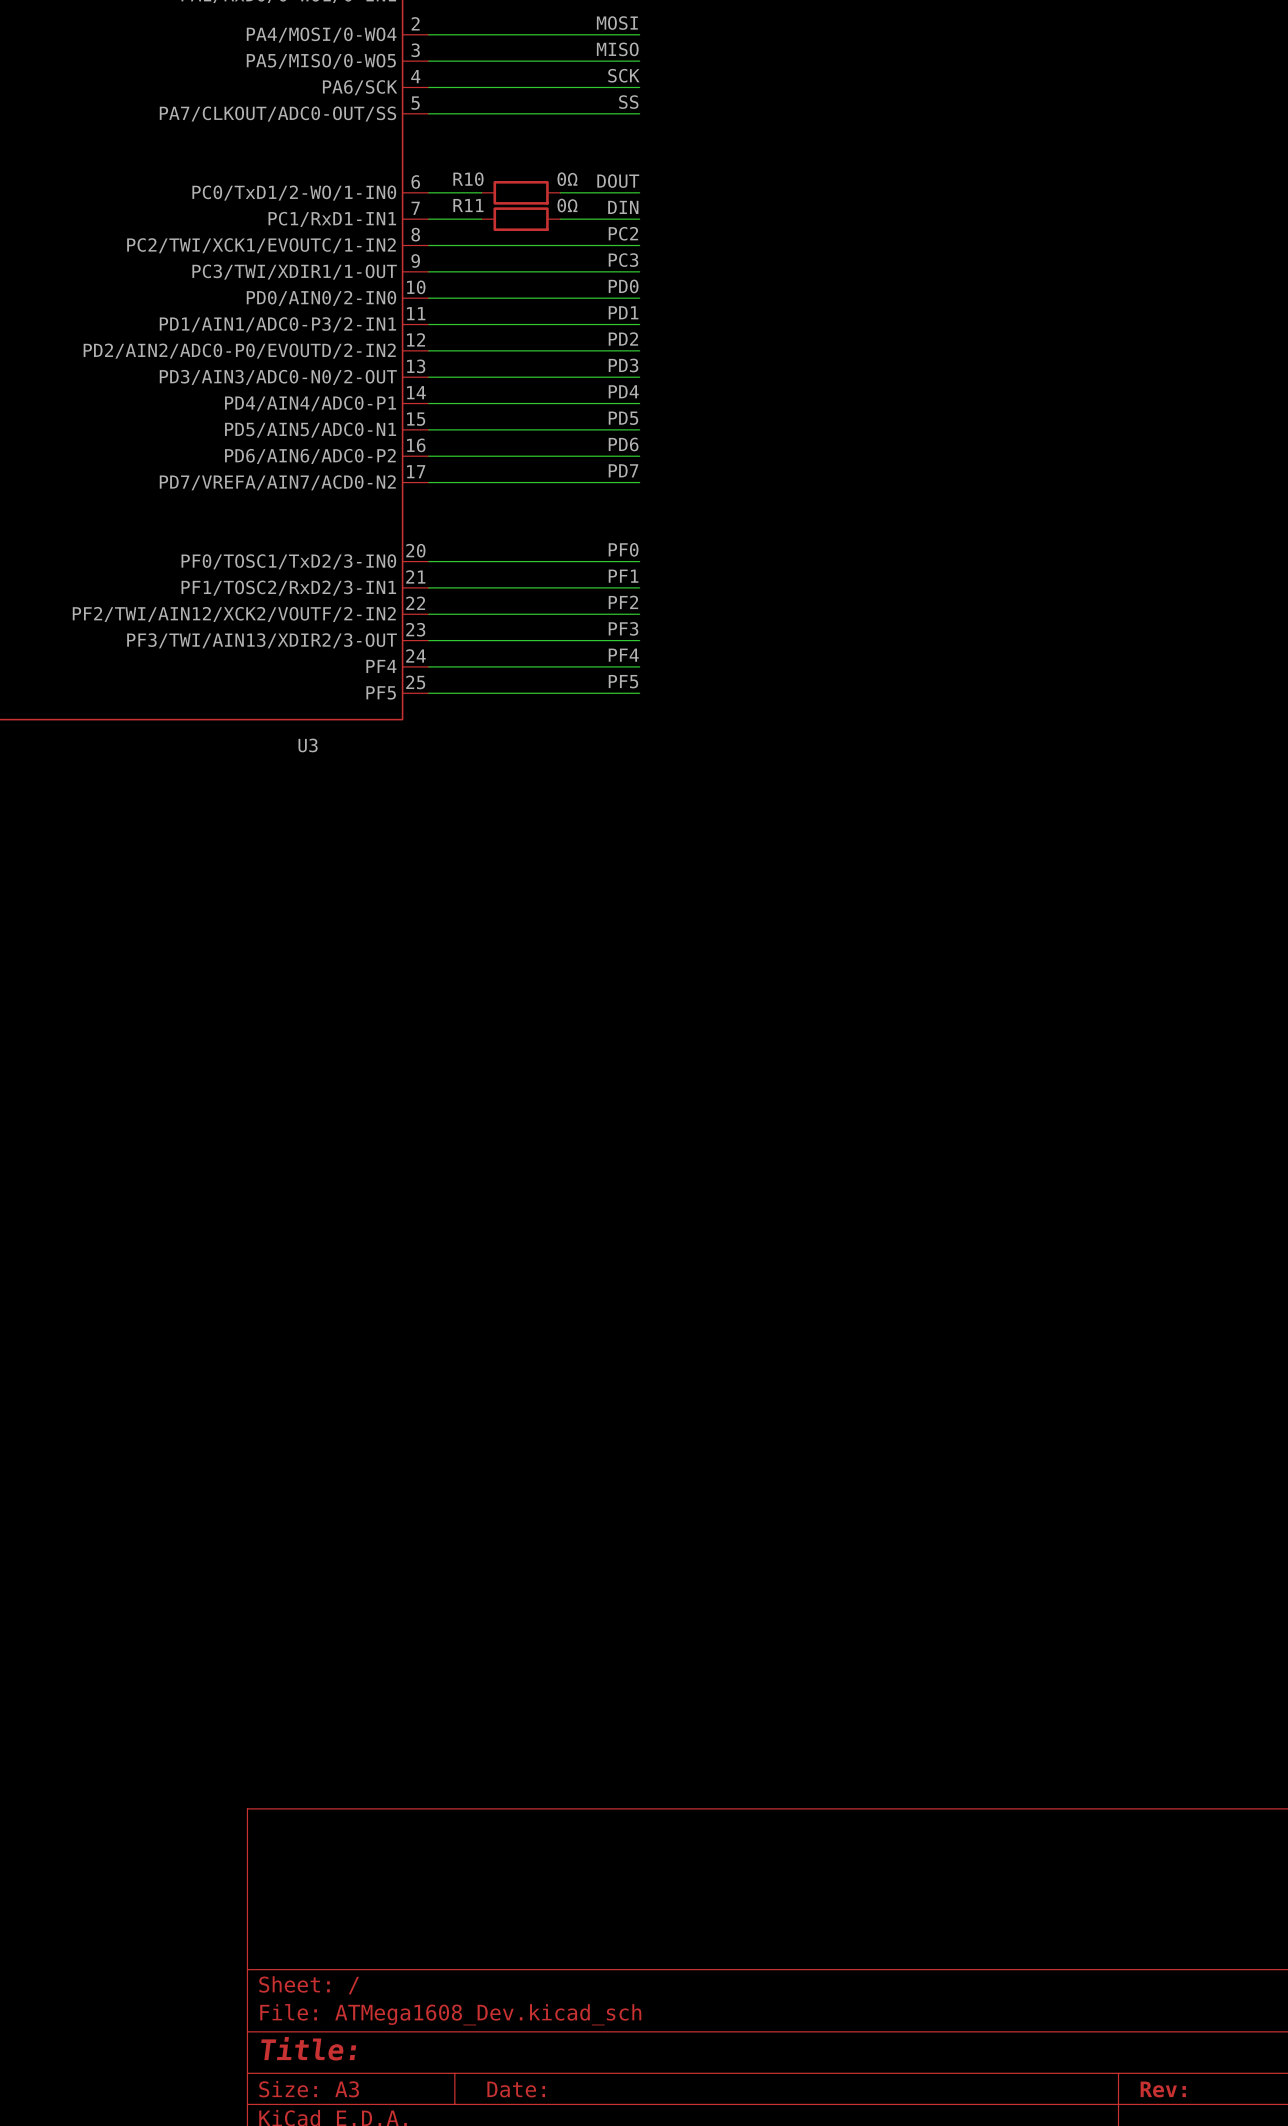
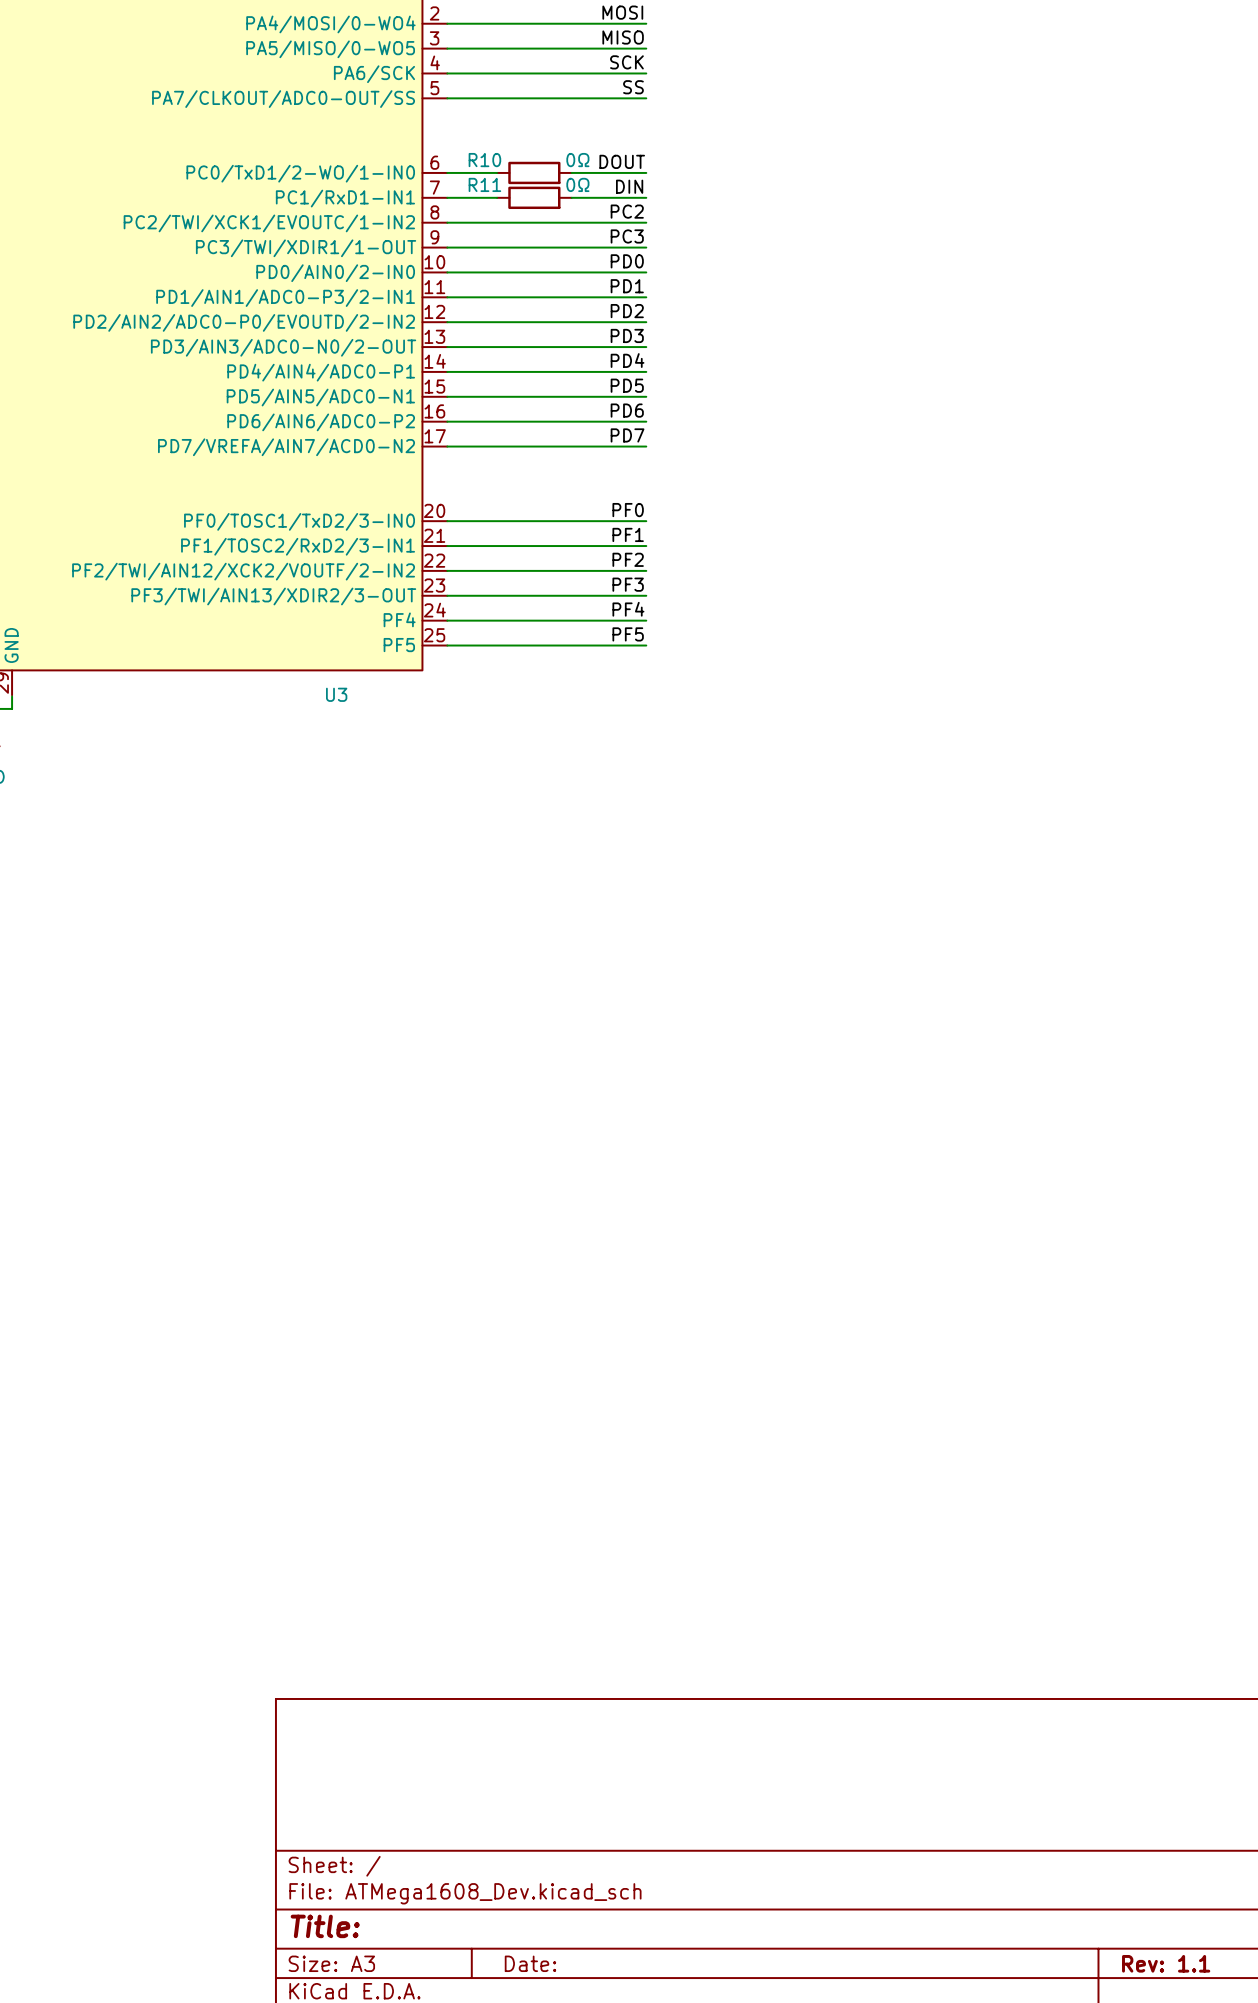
title block: Rev: (1163, 2089) -> Rev: 1.1 (1166, 1963)

